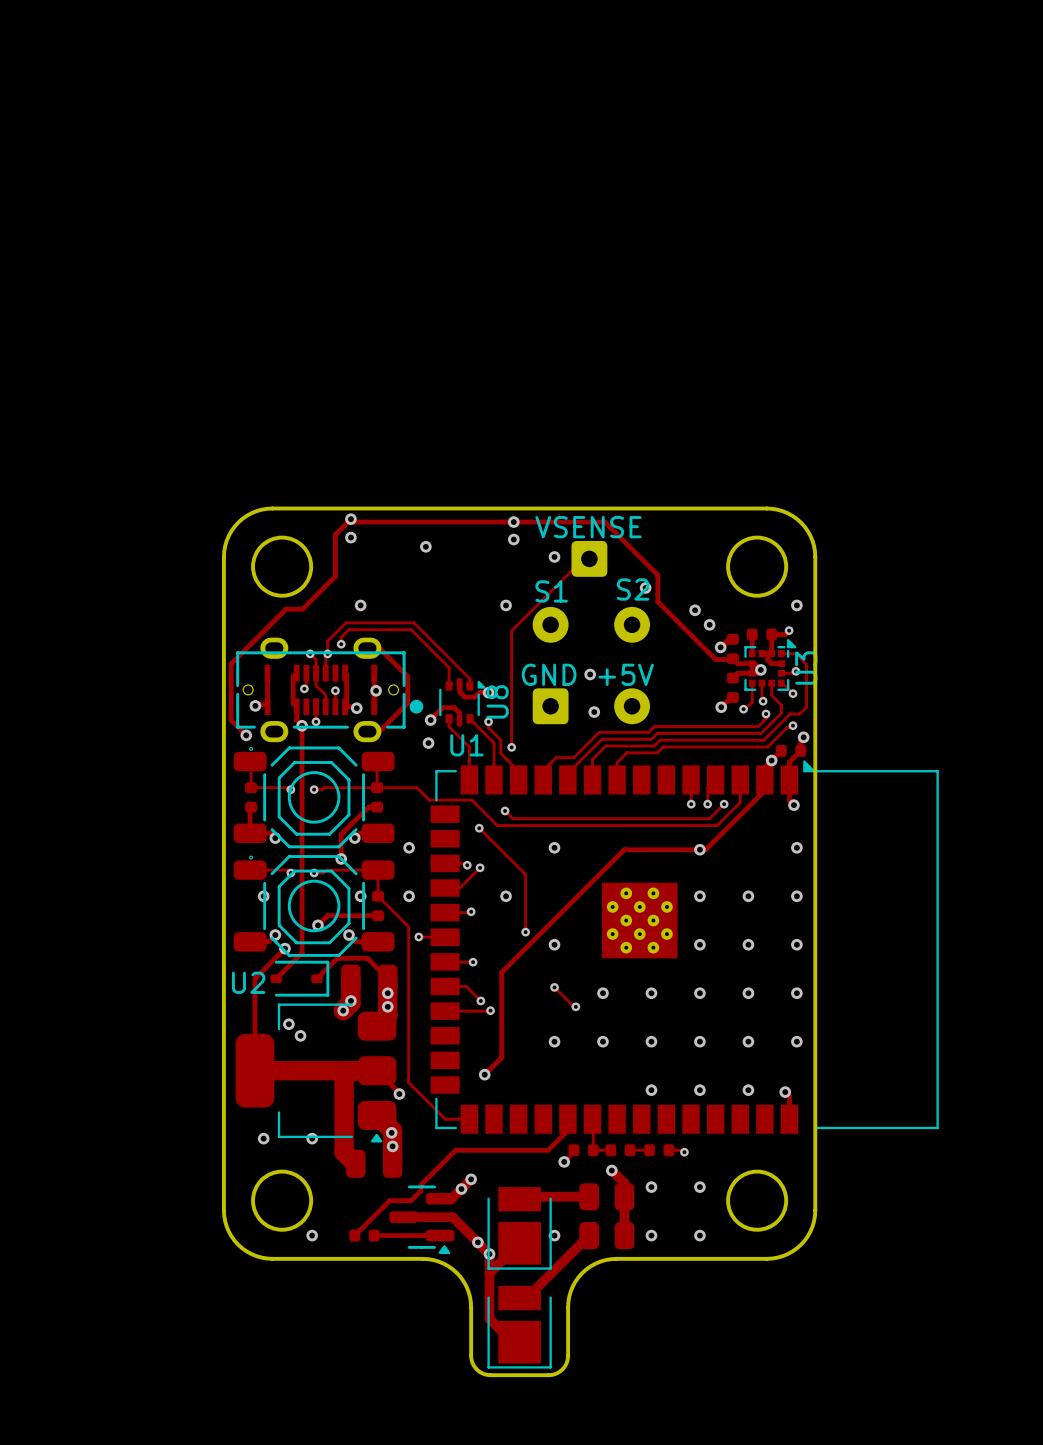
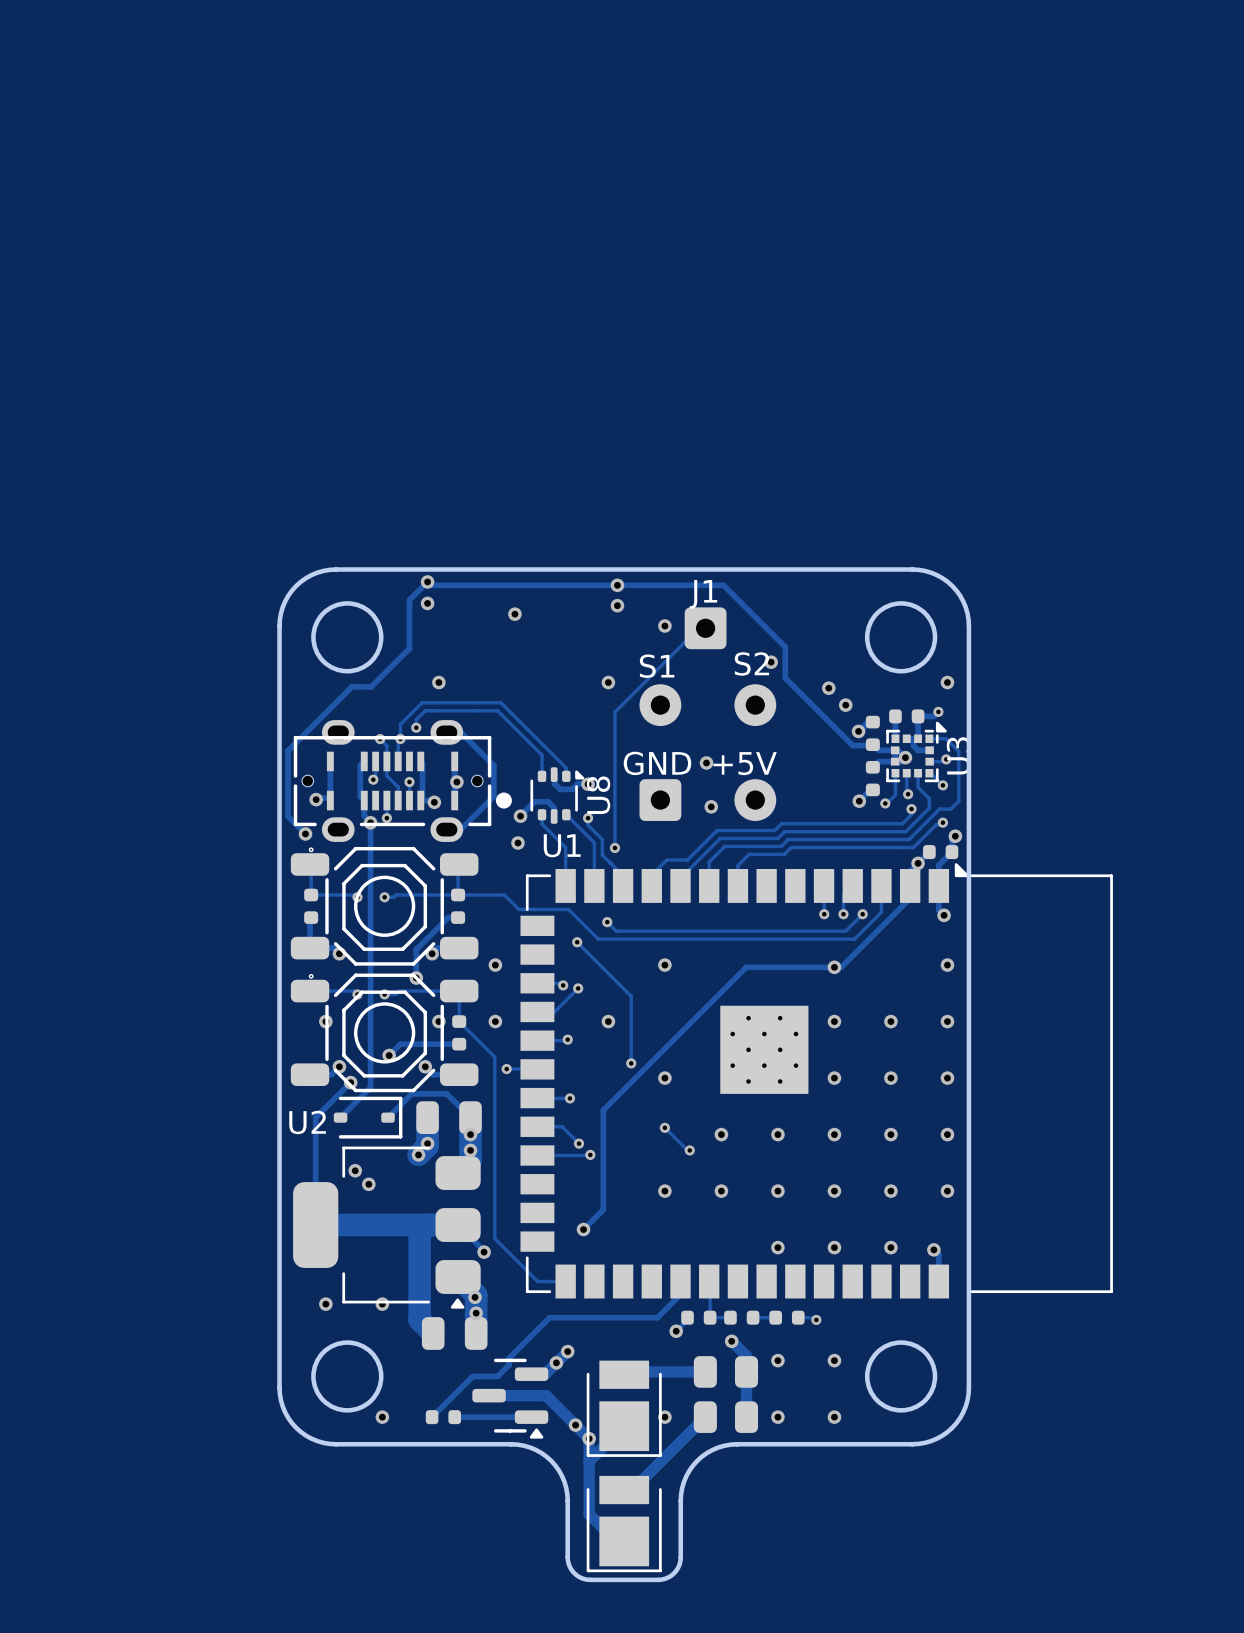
VSENSE name: VSENSE (588, 527) -> J1 (703, 594)

